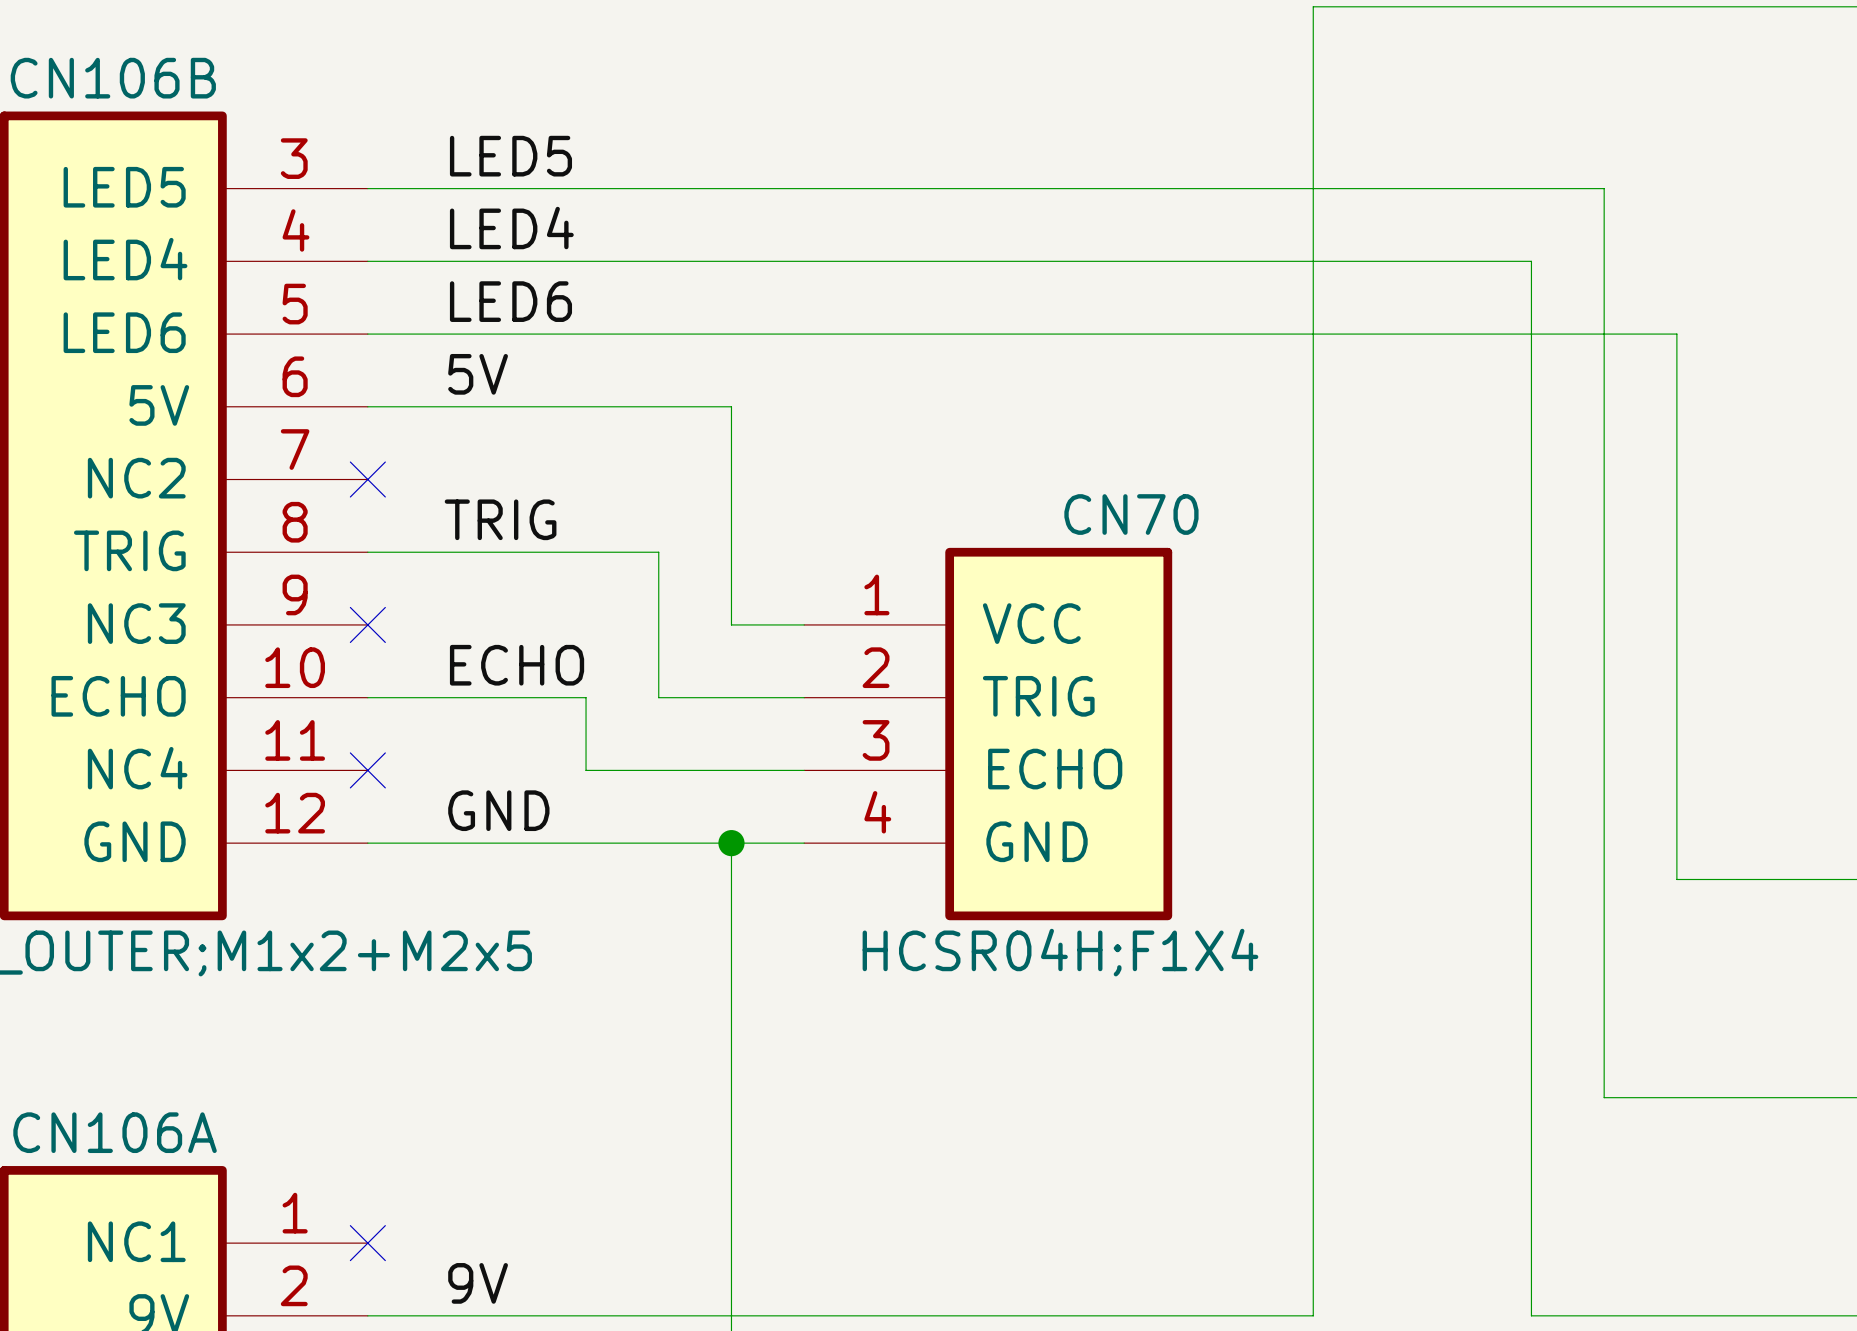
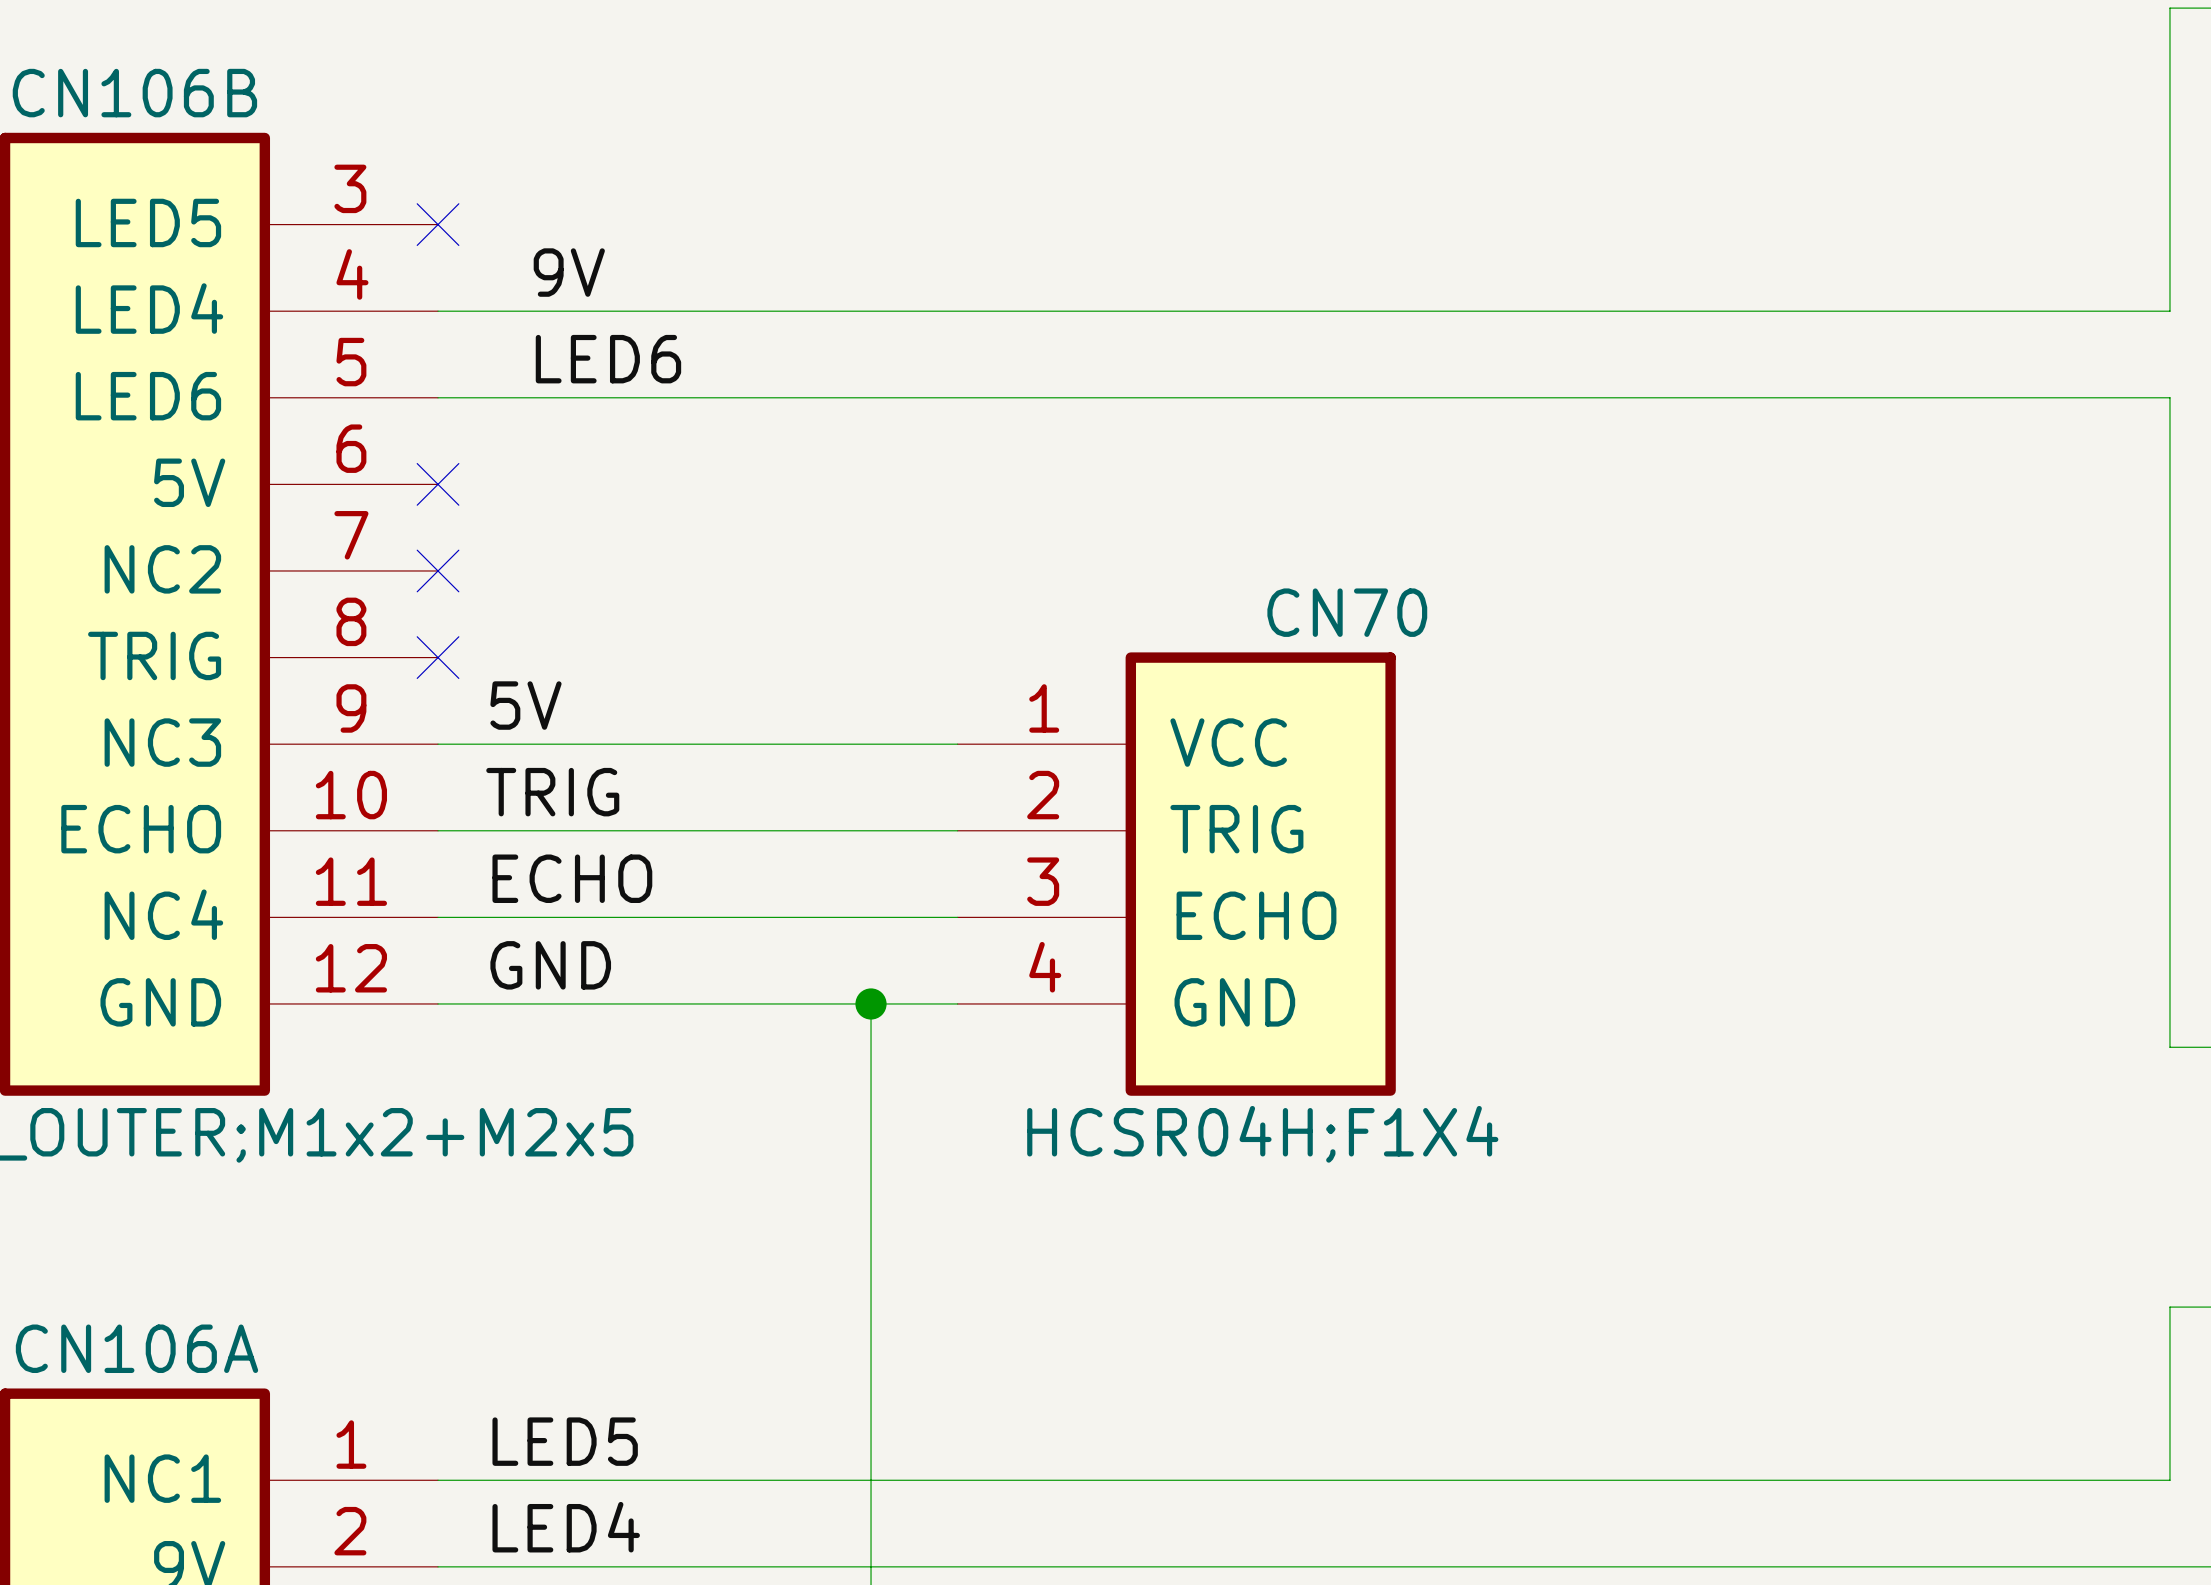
wire: (1822, 6) (1313, 6) (1313, 1315) -> (2169, 8) (2169, 311) (1823, 311)
label: LED5 (510, 156) -> none
wire: (367, 188) (1604, 188) (1604, 1097) (1822, 1097) -> (438, 1480) (2169, 1480) (2169, 1307)
no-connect mark: none -> (438, 224)
label: LED4 (511, 228) -> 9V (569, 272)
wire: (1531, 261) (1531, 1315) -> (1563, 1566) (1823, 1566)
wire: (1676, 334) (1676, 879) (1822, 879) -> (1996, 397) (2169, 397) (2169, 1047)
label position: 5V (478, 374) -> 5V (525, 705)
wire: (367, 406) (731, 406) (731, 624) -> (438, 744) (871, 744)
no-connect mark: none -> (438, 484)
label position: TRIG (500, 519) -> TRIG (552, 792)
wire: (367, 552) (658, 552) (658, 697) -> none
no-connect mark position: (367, 624) -> (438, 657)
label position: ECHO (517, 665) -> ECHO (572, 878)
wire: (586, 697) (586, 770) -> (697, 830) (784, 830)
wire: none -> (438, 917) (697, 917)
no-connect mark: (367, 770) -> none
label position: GND (498, 810) -> GND (550, 965)
label: none -> LED5 (565, 1441)
no-connect mark: (367, 1243) -> none
label: none -> LED4 (566, 1527)
label: 9V (478, 1283) -> none

